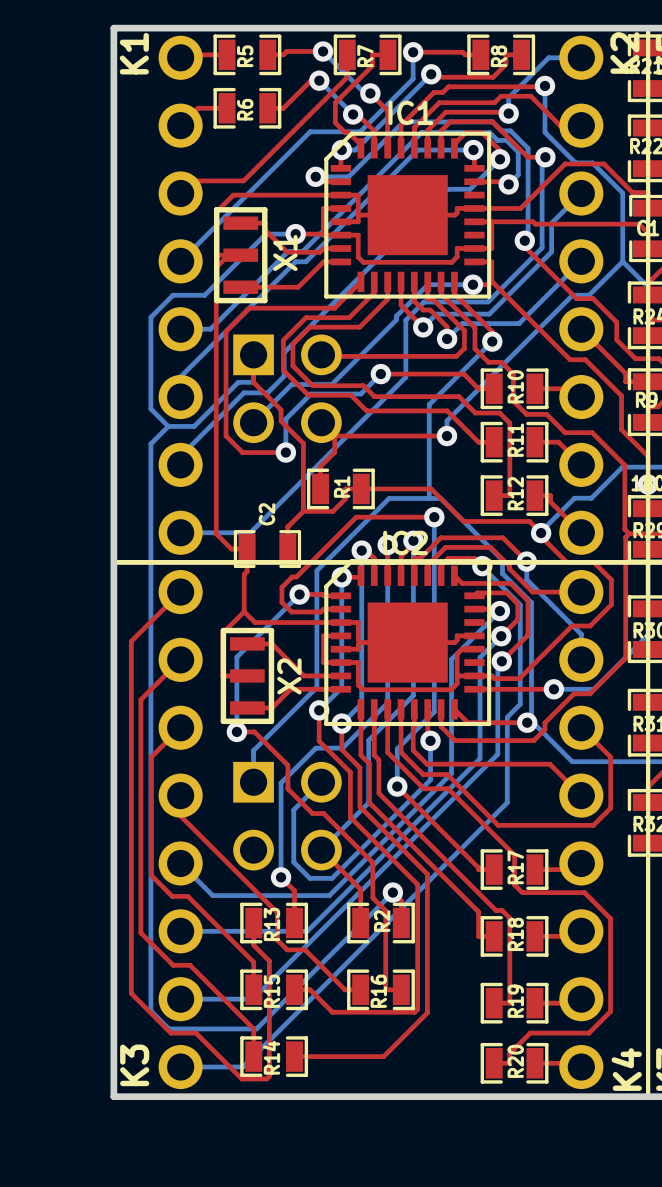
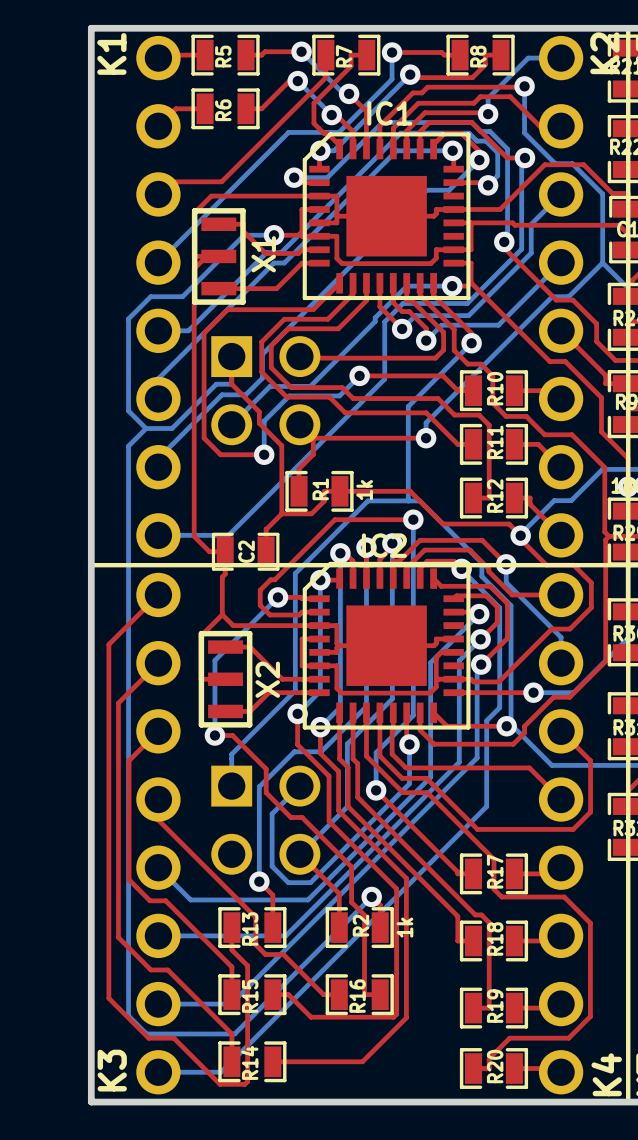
R1 value: none -> 1k (364, 490)
C2 name position: C2 (266, 514) -> C2 (246, 551)
R2 value: none -> 1k (404, 927)

